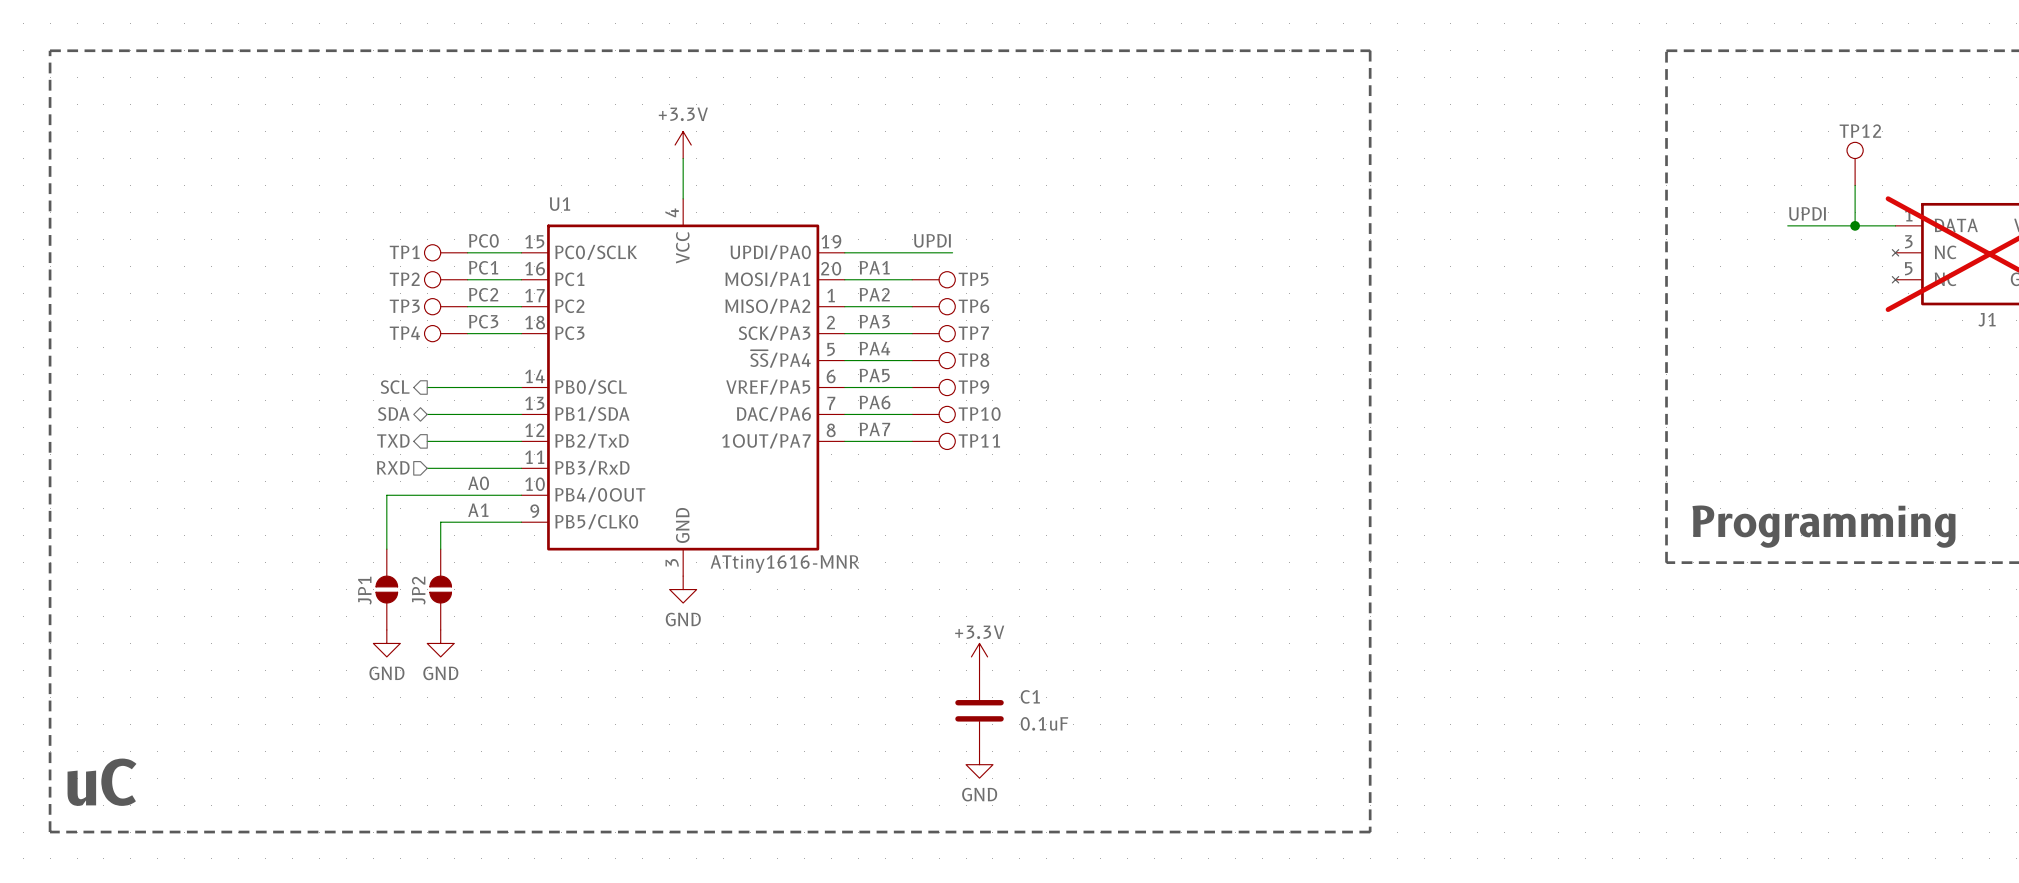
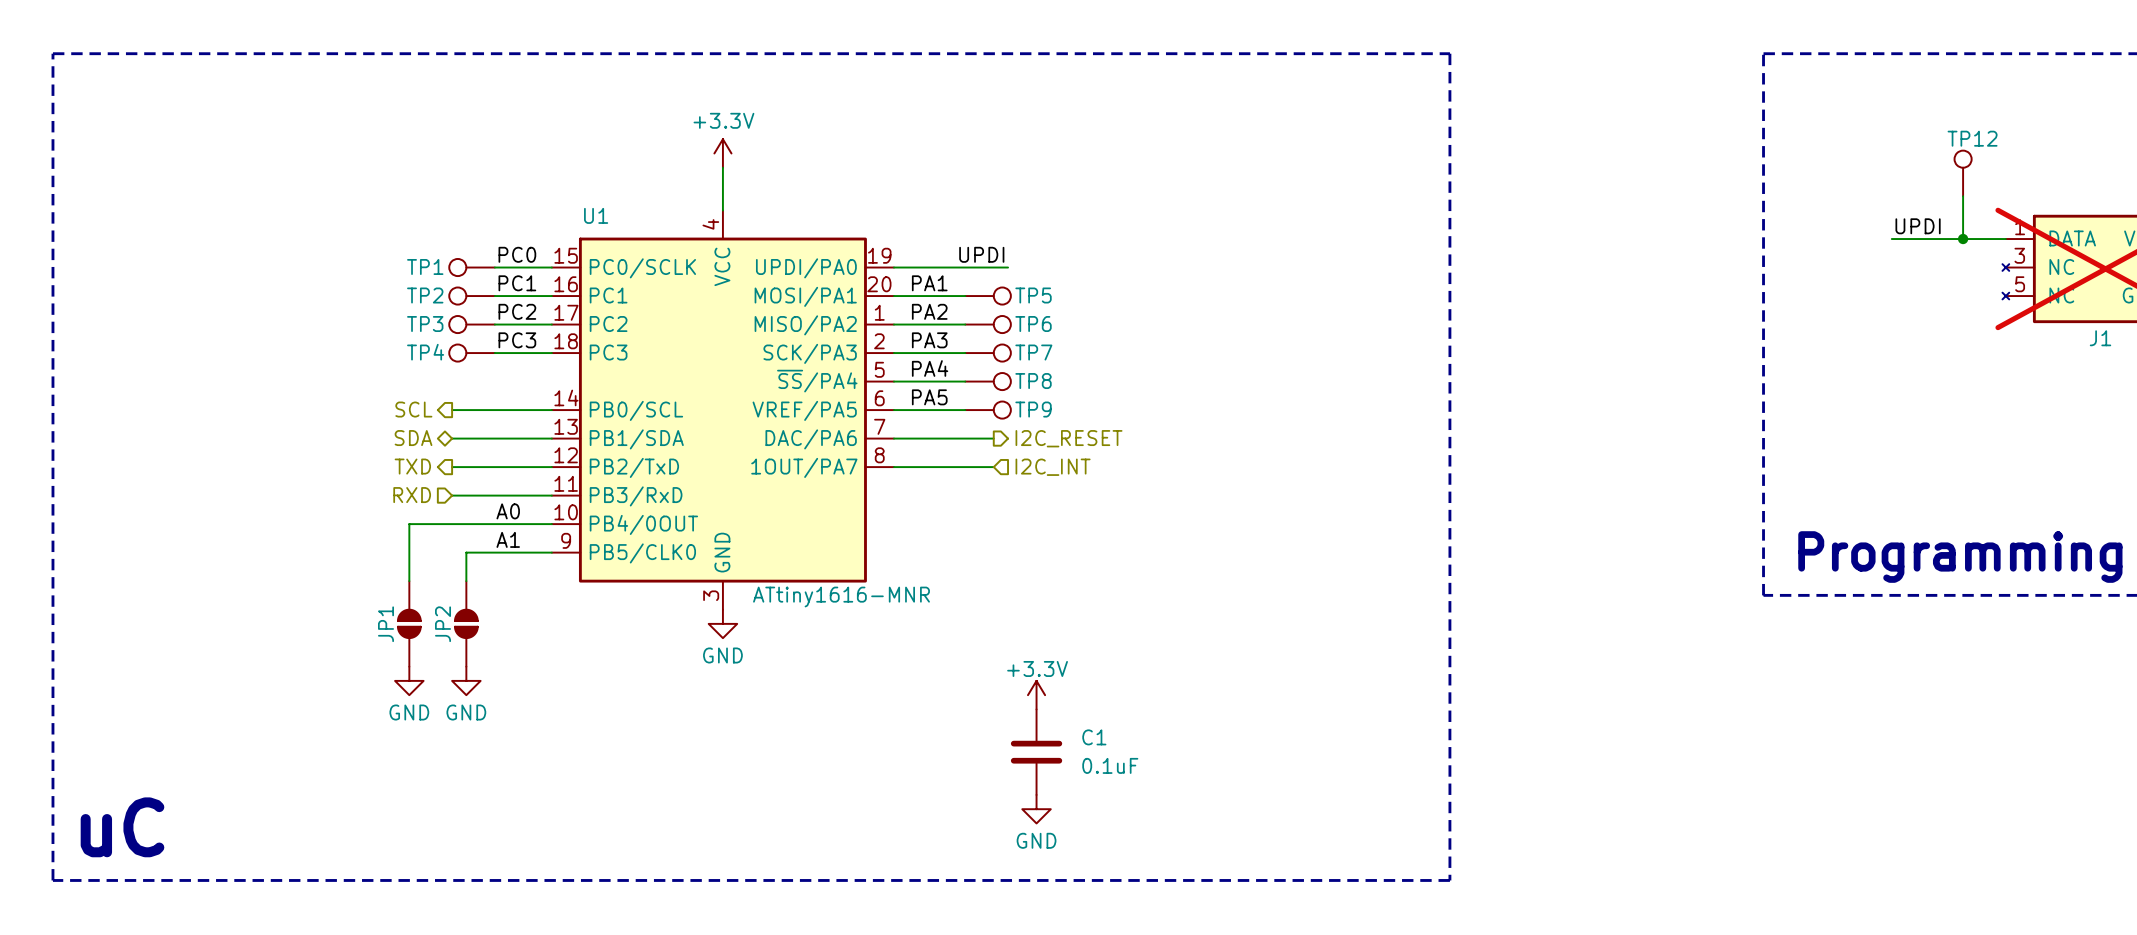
label: PA6 (875, 402) -> none
TP10: (933, 414) -> none
hierarchical label: none -> I2C_RESET (1069, 438)
label: PA7 (874, 429) -> none
TP11: (933, 441) -> none
hierarchical label: none -> I2C_INT (1053, 467)

